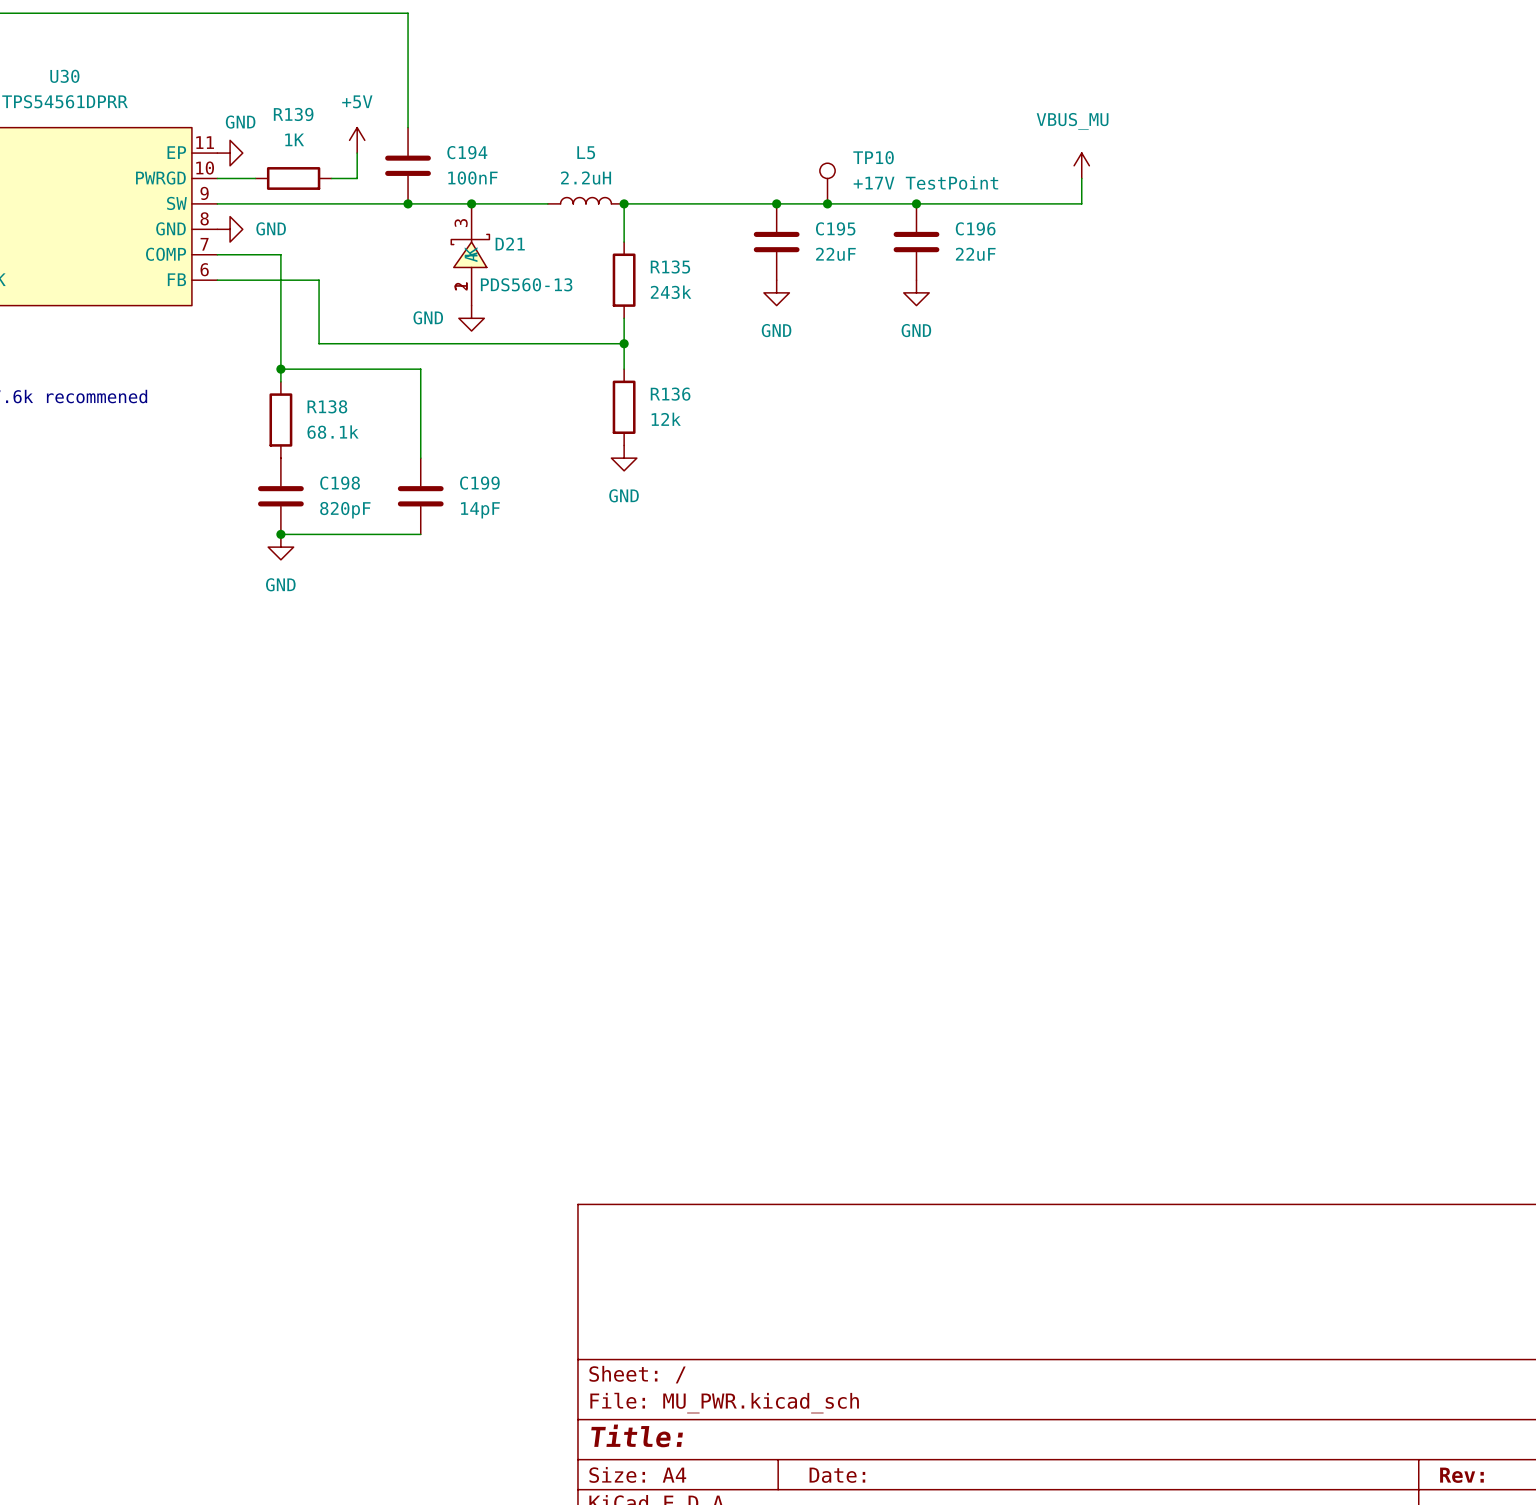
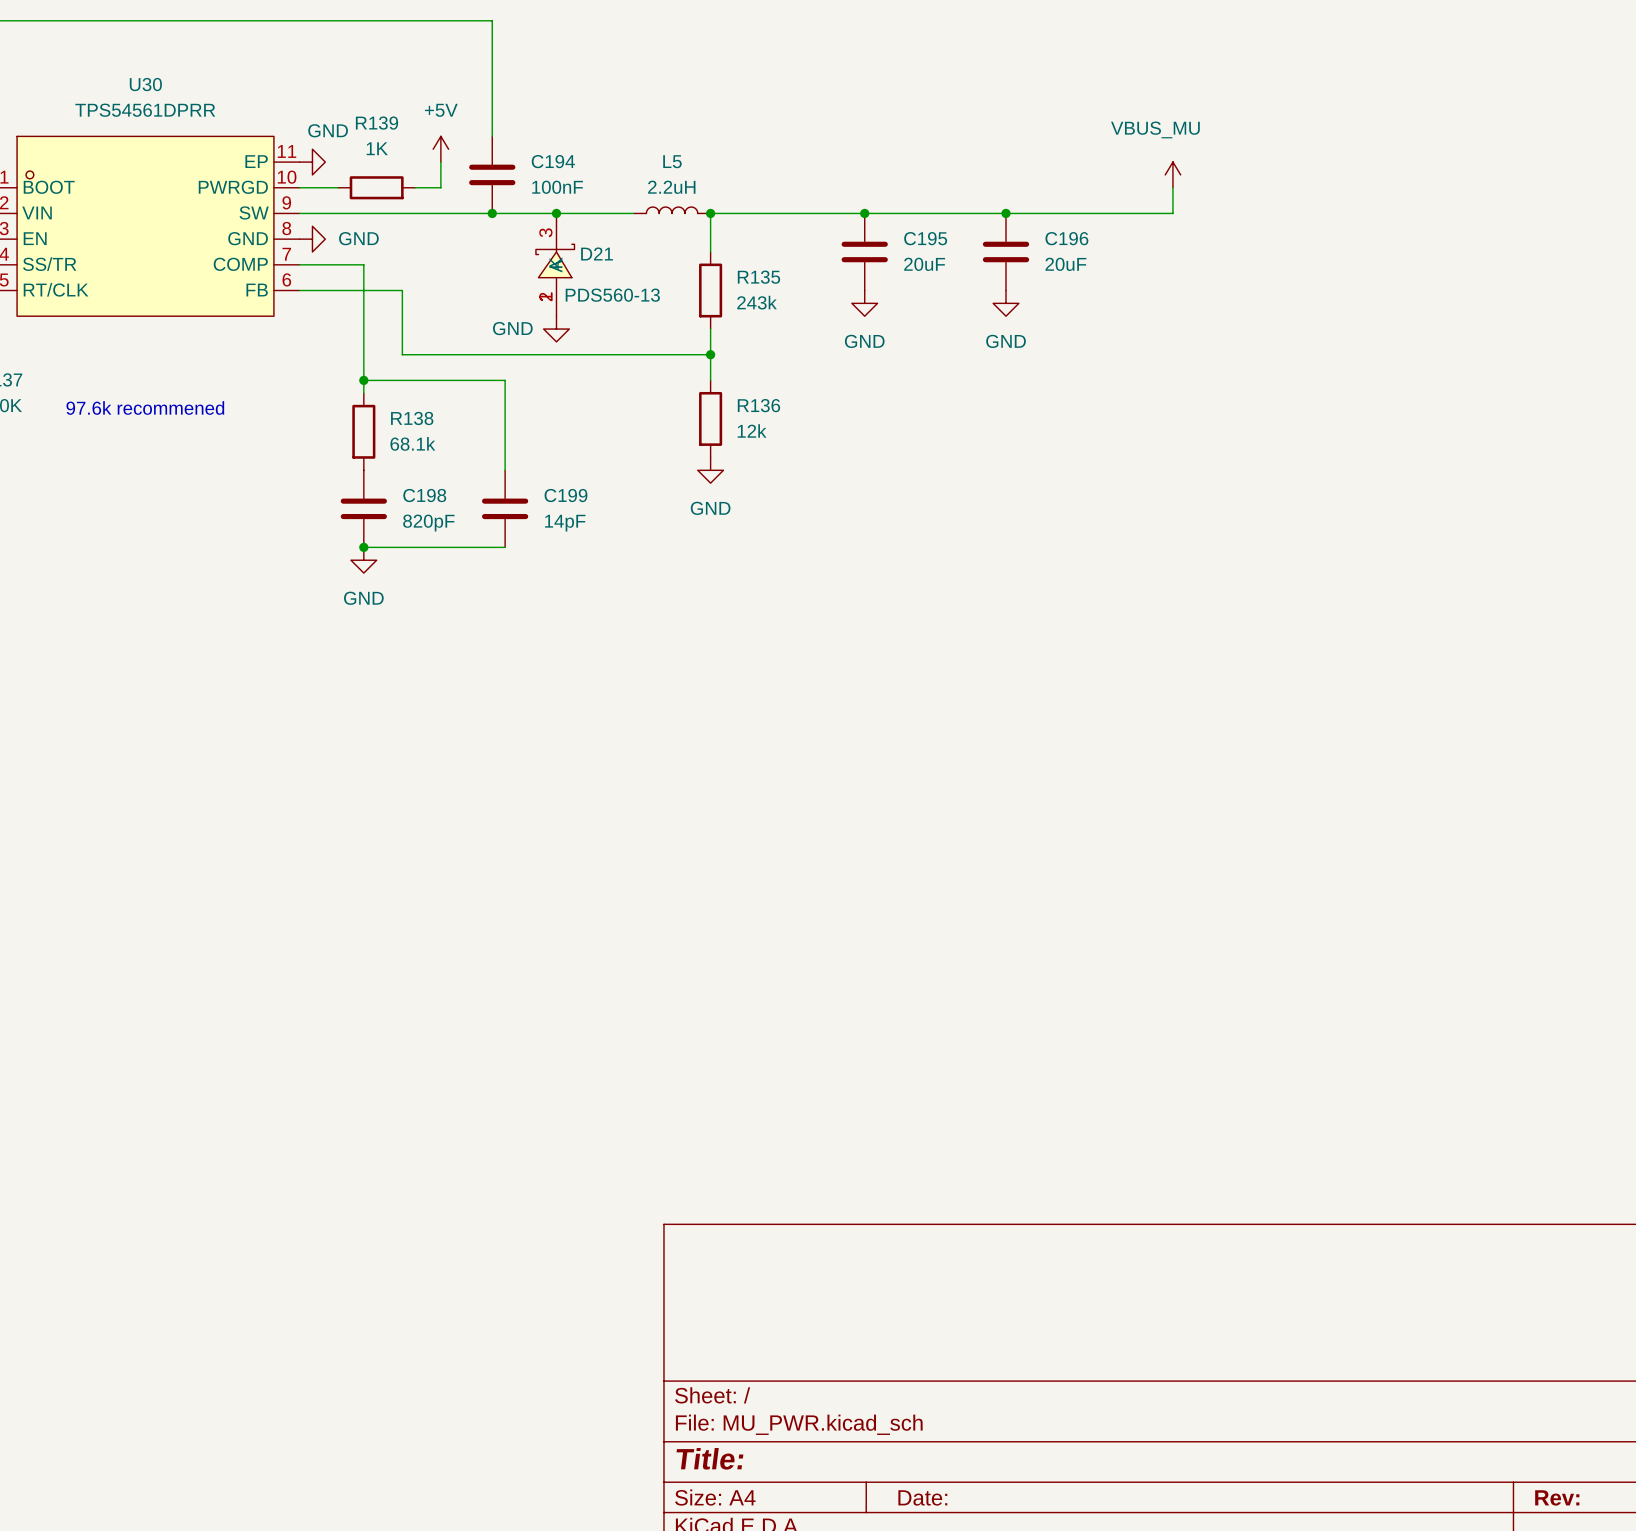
TP10: +17V TestPoint (827, 183) -> none
junction: (827, 203) -> none
C195 value: 22uF (835, 254) -> 20uF (924, 264)
C196 value: 22uF (975, 254) -> 20uF (1065, 264)

